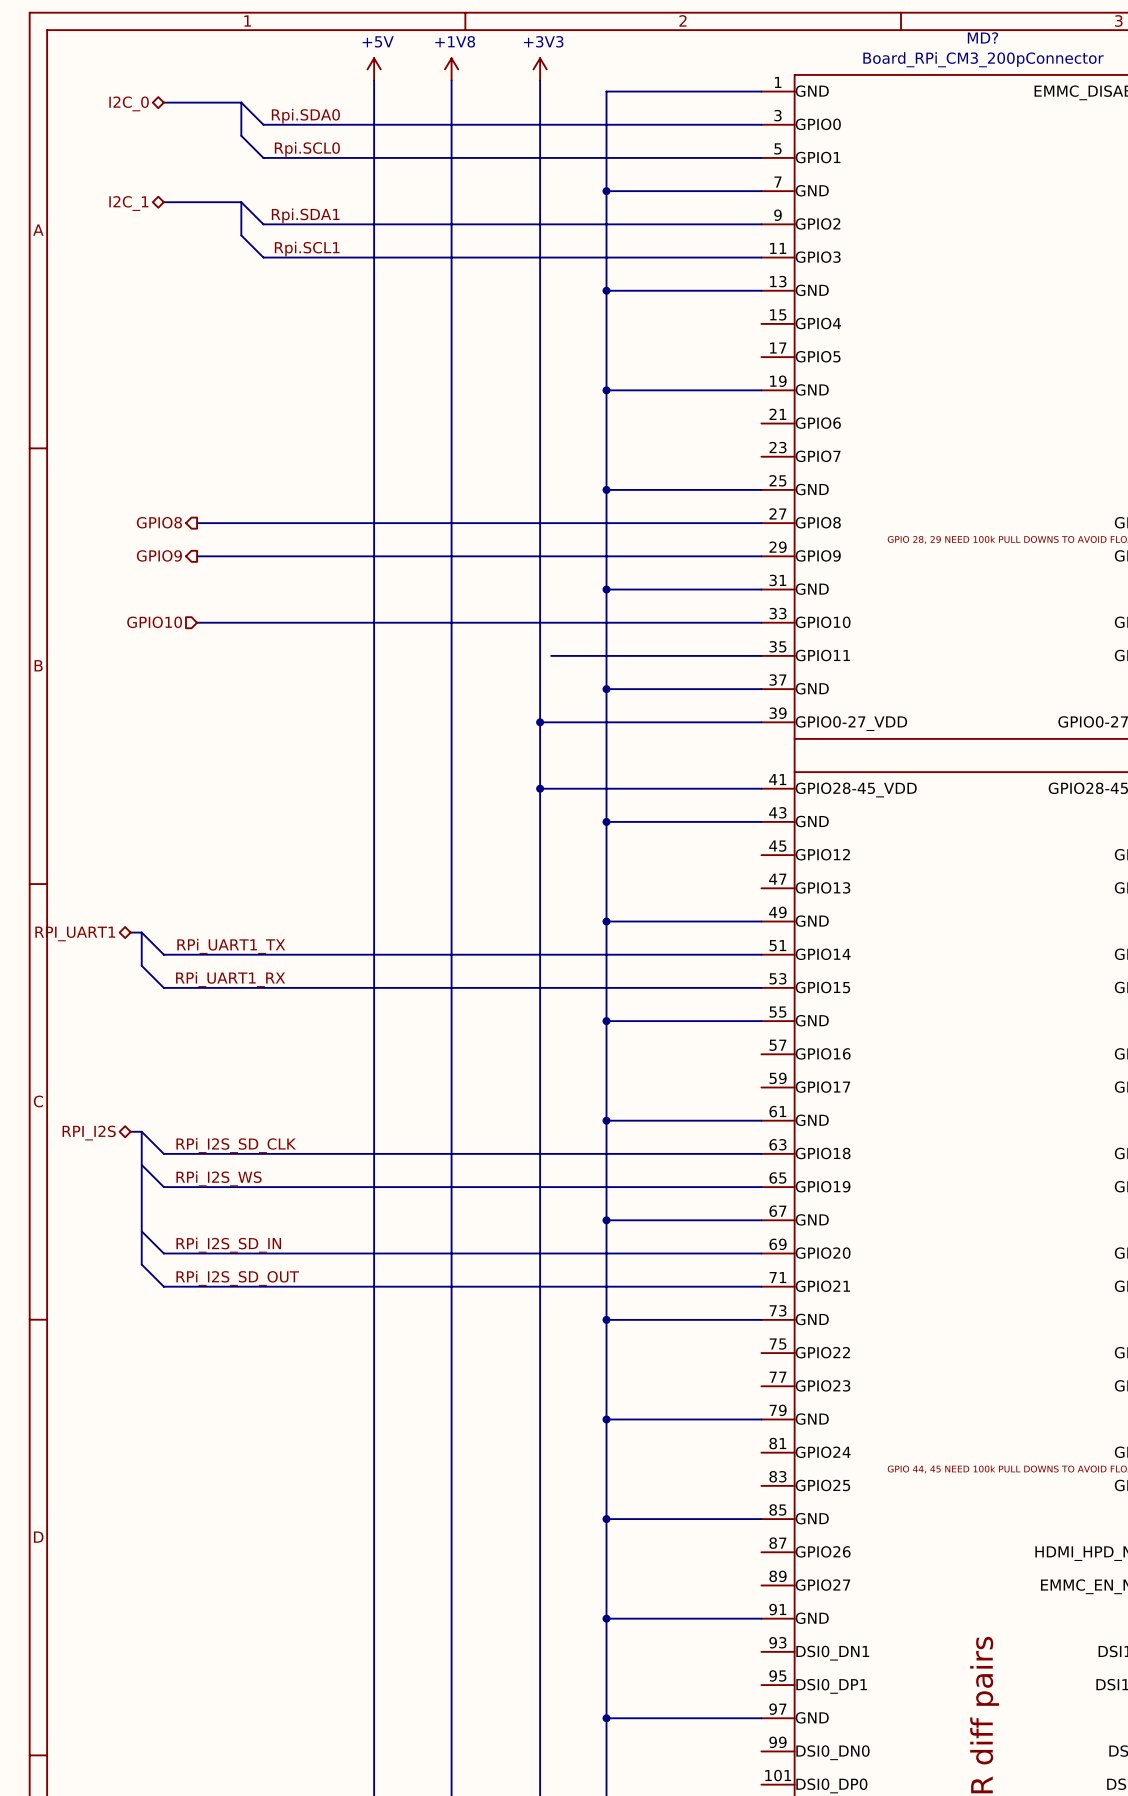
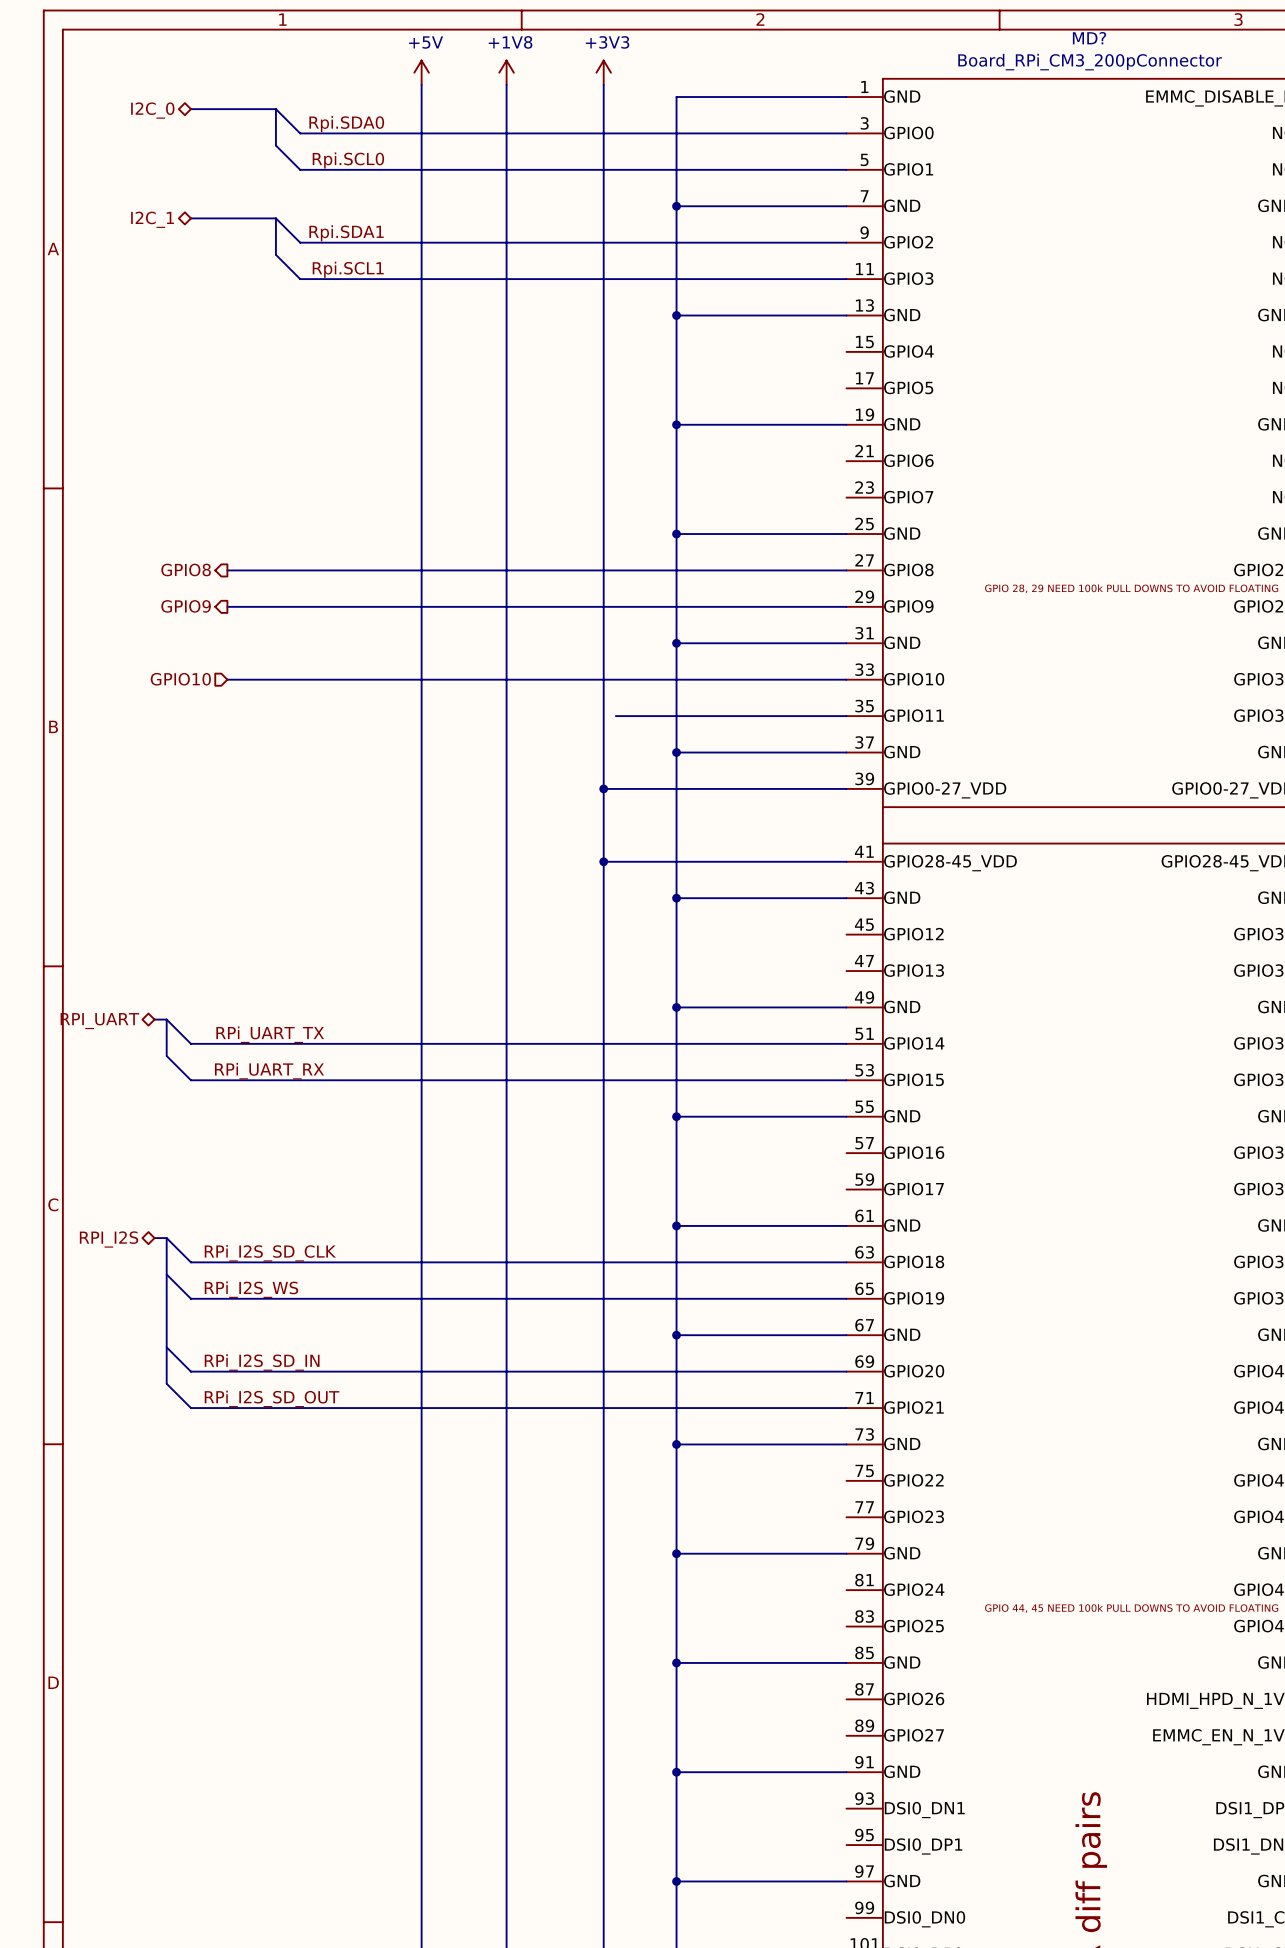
hierarchical label: RPI_UART1 (75, 933) -> RPI_UART (99, 1021)
label: RPi_UART1_TX (231, 946) -> RPi_UART_TX (270, 1034)
label: RPi_UART1_RX (230, 979) -> RPi_UART_RX (269, 1071)

